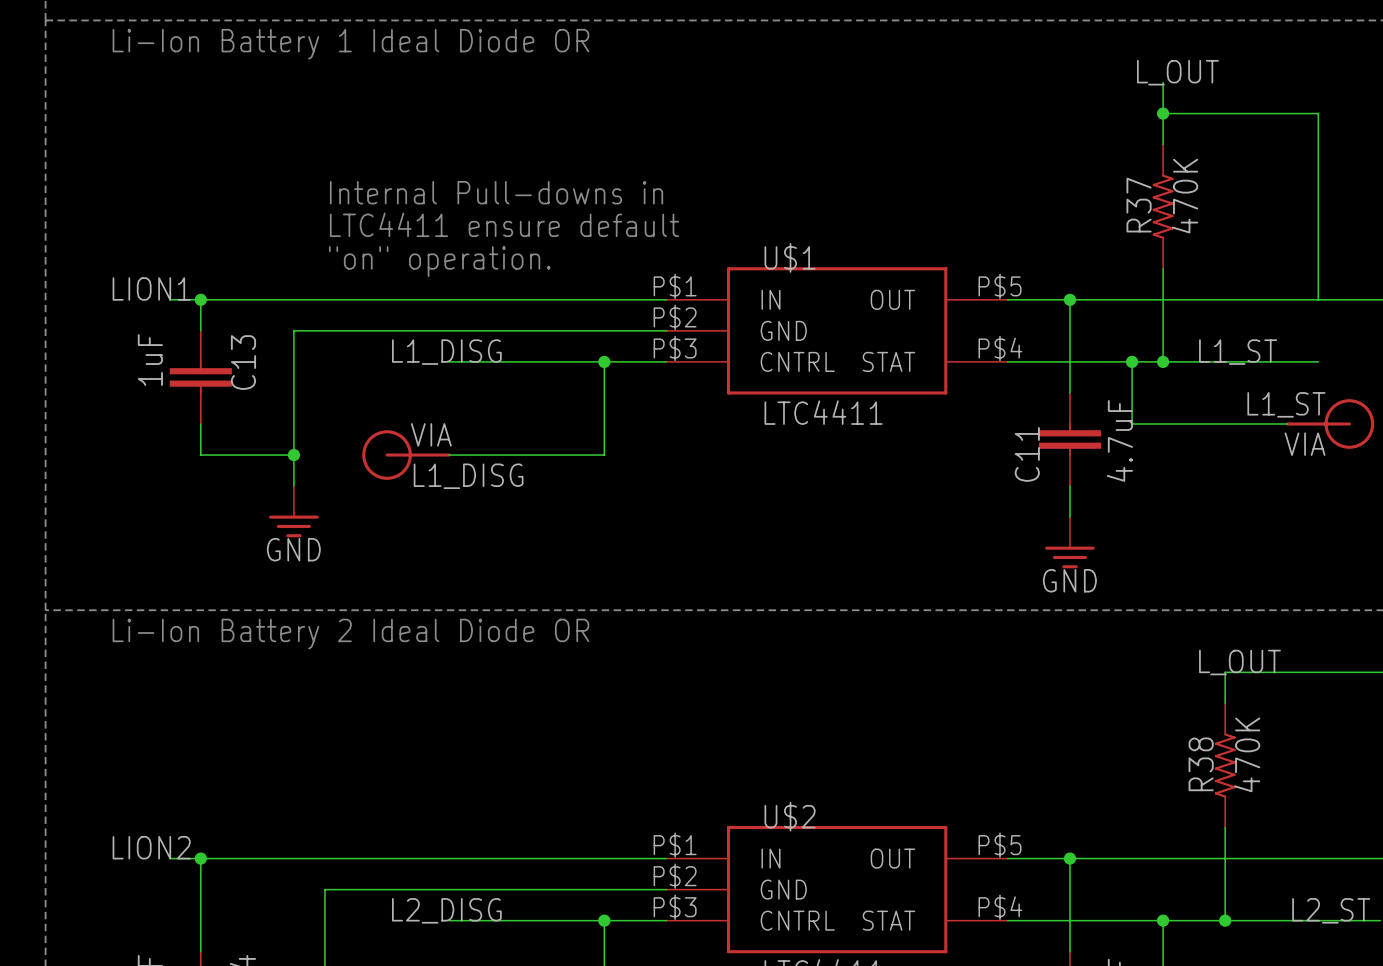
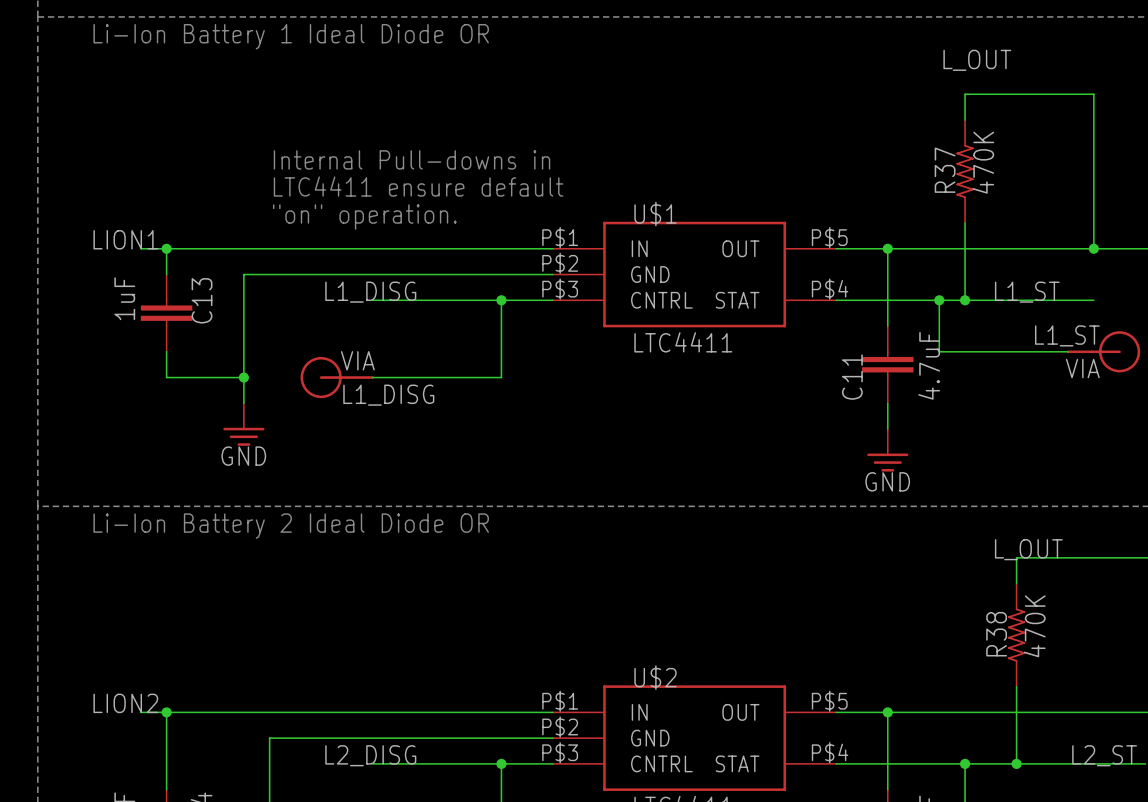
wire: (1163, 82) (1163, 113) -> none
junction: (1163, 113) -> none
junction: none -> (1093, 248)

